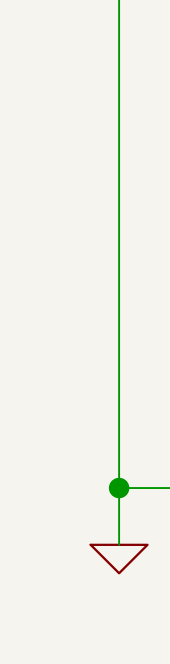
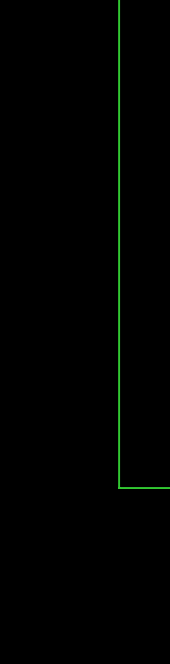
wire: (119, 488) (119, 544) -> none
junction: (119, 488) -> none
power symbol: (119, 559) -> none

